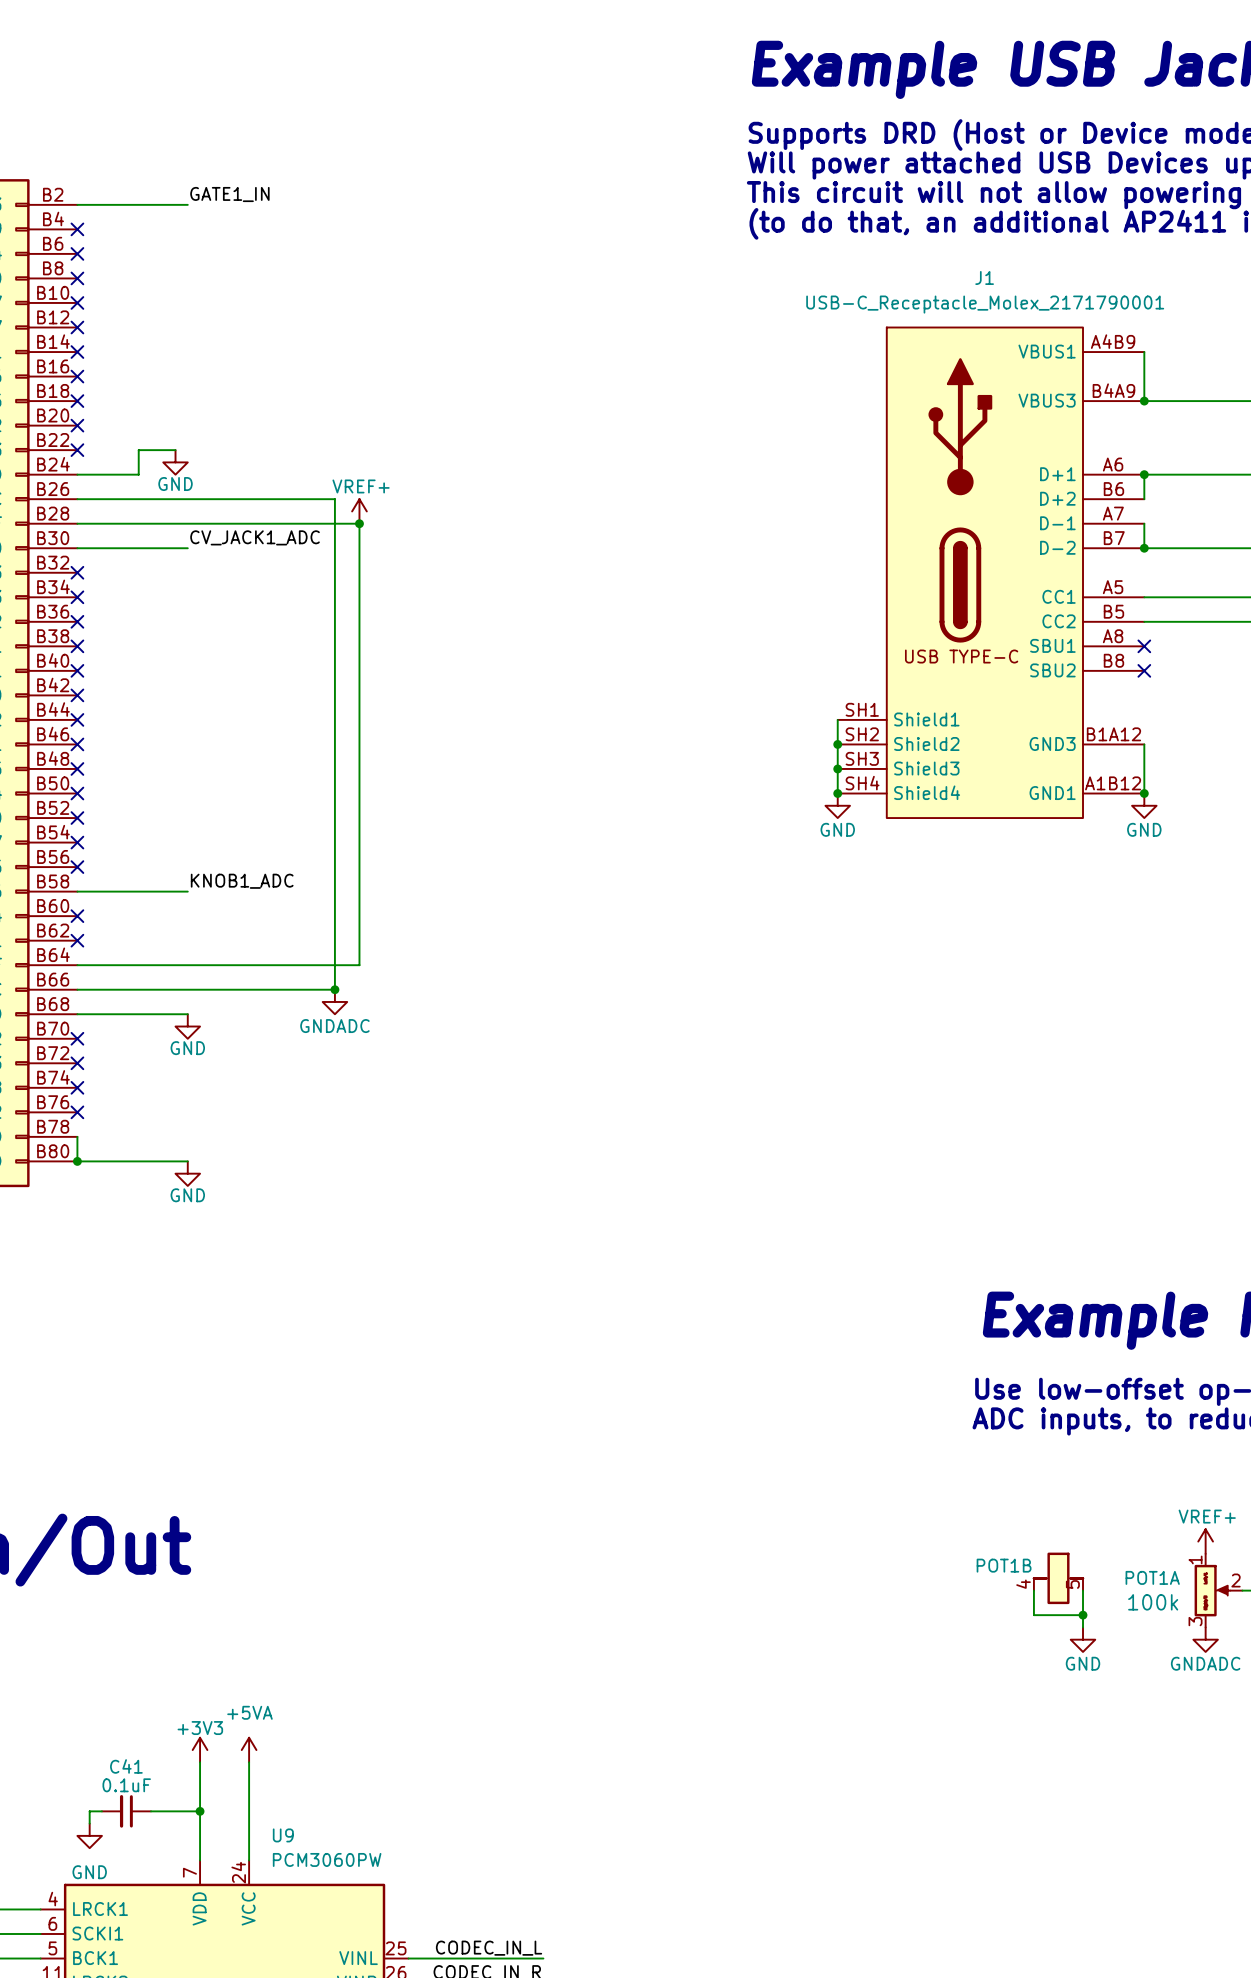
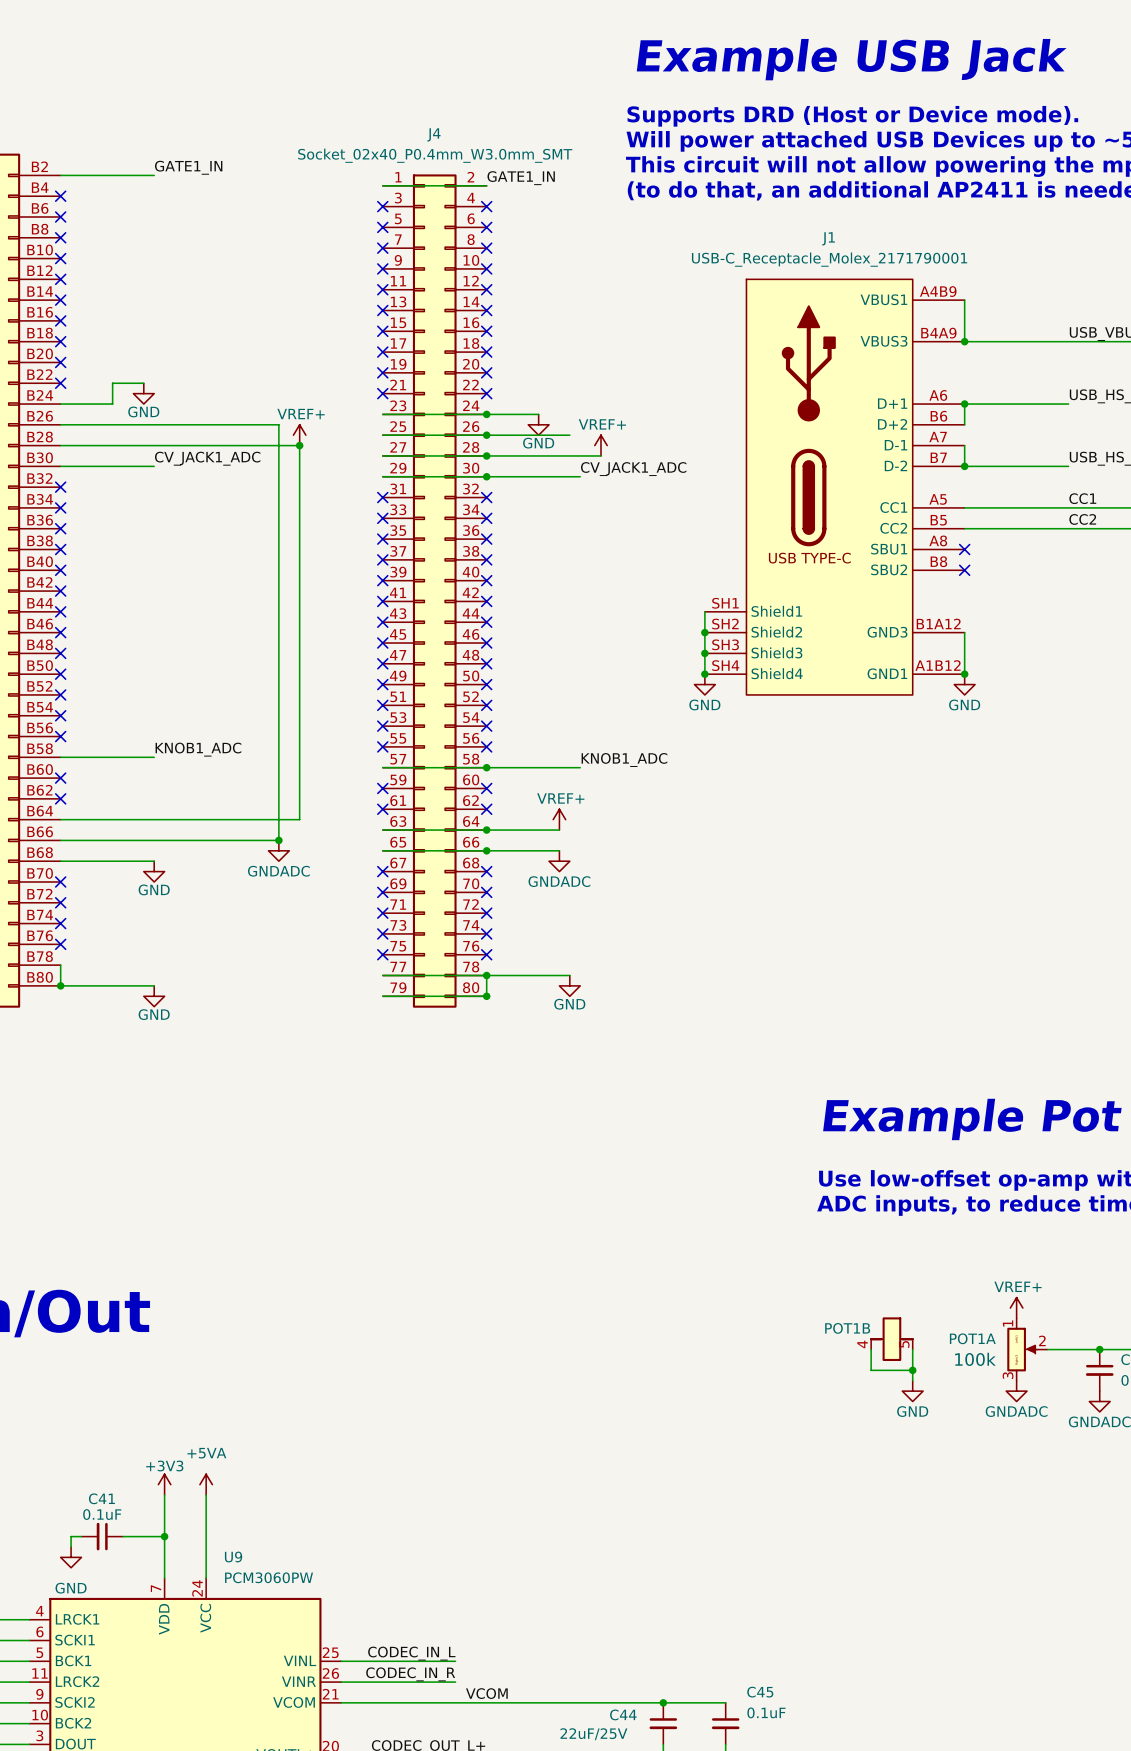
label: none -> GATE1_IN (521, 178)
wire: none -> (382, 185) (486, 185)
no-connect mark: none -> (382, 206)
no-connect mark: none -> (486, 206)
no-connect mark: none -> (382, 227)
no-connect mark: none -> (486, 227)
no-connect mark: none -> (382, 248)
no-connect mark: none -> (486, 248)
no-connect mark: none -> (382, 268)
no-connect mark: none -> (486, 268)
no-connect mark: none -> (382, 289)
no-connect mark: none -> (486, 289)
no-connect mark: none -> (382, 310)
no-connect mark: none -> (486, 310)
no-connect mark: none -> (382, 331)
no-connect mark: none -> (486, 331)
no-connect mark: none -> (382, 352)
no-connect mark: none -> (486, 352)
no-connect mark: none -> (382, 372)
no-connect mark: none -> (486, 372)
no-connect mark: none -> (382, 393)
no-connect mark: none -> (486, 393)
wire: none -> (382, 414) (538, 414)
junction: none -> (486, 414)
power symbol: none -> GND (538, 424)
wire: none -> (382, 435) (569, 435)
junction: none -> (486, 435)
power symbol: none -> VREF+ (600, 445)
wire: none -> (382, 455) (600, 455)
junction: none -> (486, 455)
label: none -> CV_JACK1_ADC (633, 469)
wire: none -> (382, 476) (580, 476)
junction: none -> (486, 476)
no-connect mark: none -> (382, 497)
no-connect mark: none -> (486, 497)
no-connect mark: none -> (382, 518)
no-connect mark: none -> (486, 518)
no-connect mark: none -> (382, 539)
no-connect mark: none -> (486, 539)
no-connect mark: none -> (382, 559)
no-connect mark: none -> (486, 559)
no-connect mark: none -> (382, 580)
no-connect mark: none -> (486, 580)
J4: none -> Socket_02x40_P0.4mm_W3.0mm_SMT (434, 591)
no-connect mark: none -> (382, 601)
no-connect mark: none -> (486, 601)
no-connect mark: none -> (382, 622)
no-connect mark: none -> (486, 622)
no-connect mark: none -> (382, 643)
no-connect mark: none -> (486, 643)
no-connect mark: none -> (382, 663)
no-connect mark: none -> (486, 663)
no-connect mark: none -> (382, 684)
no-connect mark: none -> (486, 684)
no-connect mark: none -> (382, 705)
no-connect mark: none -> (486, 705)
no-connect mark: none -> (382, 726)
no-connect mark: none -> (486, 726)
no-connect mark: none -> (382, 746)
no-connect mark: none -> (486, 746)
label: none -> KNOB1_ADC (624, 760)
wire: none -> (382, 767) (580, 767)
junction: none -> (486, 767)
no-connect mark: none -> (382, 788)
no-connect mark: none -> (486, 788)
no-connect mark: none -> (382, 809)
no-connect mark: none -> (486, 809)
power symbol: none -> VREF+ (559, 819)
wire: none -> (382, 830) (559, 830)
junction: none -> (486, 830)
wire: none -> (382, 850) (559, 850)
junction: none -> (486, 850)
power symbol: none -> GNDADC (559, 861)
no-connect mark: none -> (382, 871)
no-connect mark: none -> (486, 871)
no-connect mark: none -> (382, 892)
no-connect mark: none -> (486, 892)
no-connect mark: none -> (382, 913)
no-connect mark: none -> (486, 913)
no-connect mark: none -> (382, 933)
no-connect mark: none -> (486, 933)
no-connect mark: none -> (382, 954)
no-connect mark: none -> (486, 954)
wire: none -> (382, 975) (569, 975)
wire: none -> (486, 975) (486, 996) (382, 996)
junction: none -> (486, 975)
power symbol: none -> GND (569, 985)
junction: none -> (486, 996)

